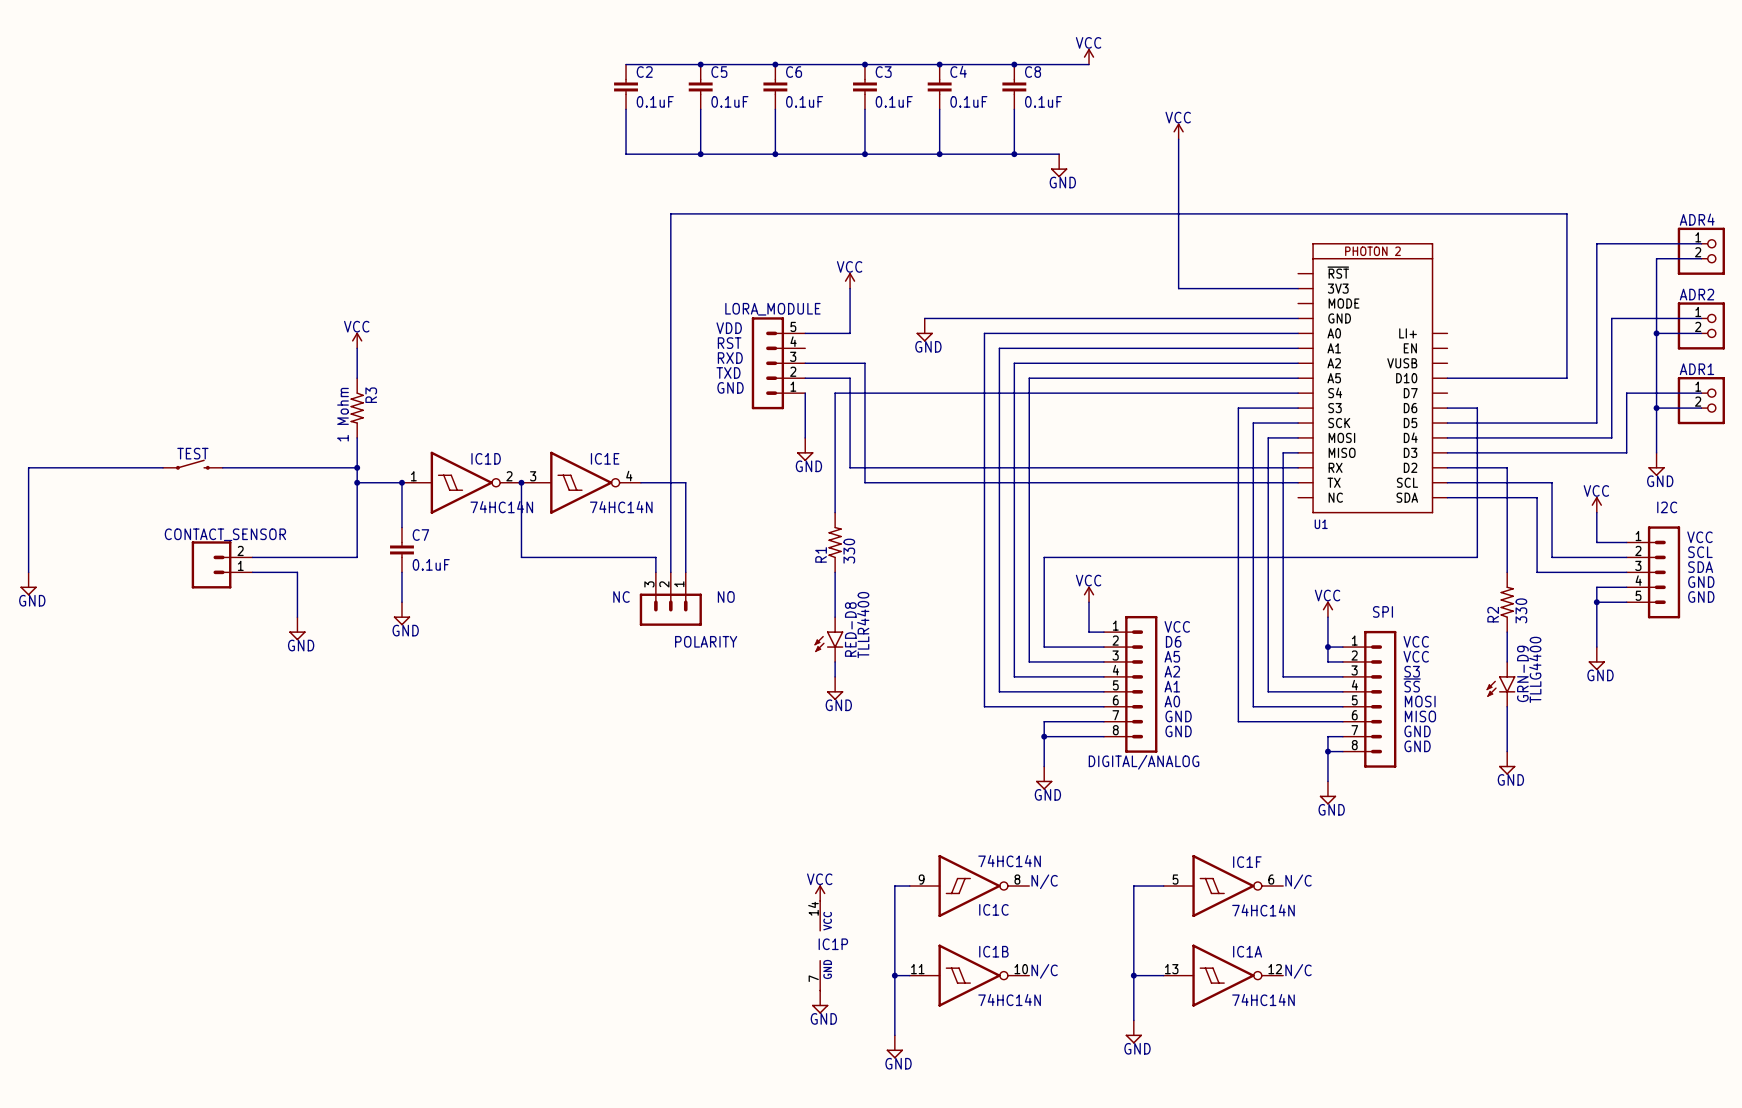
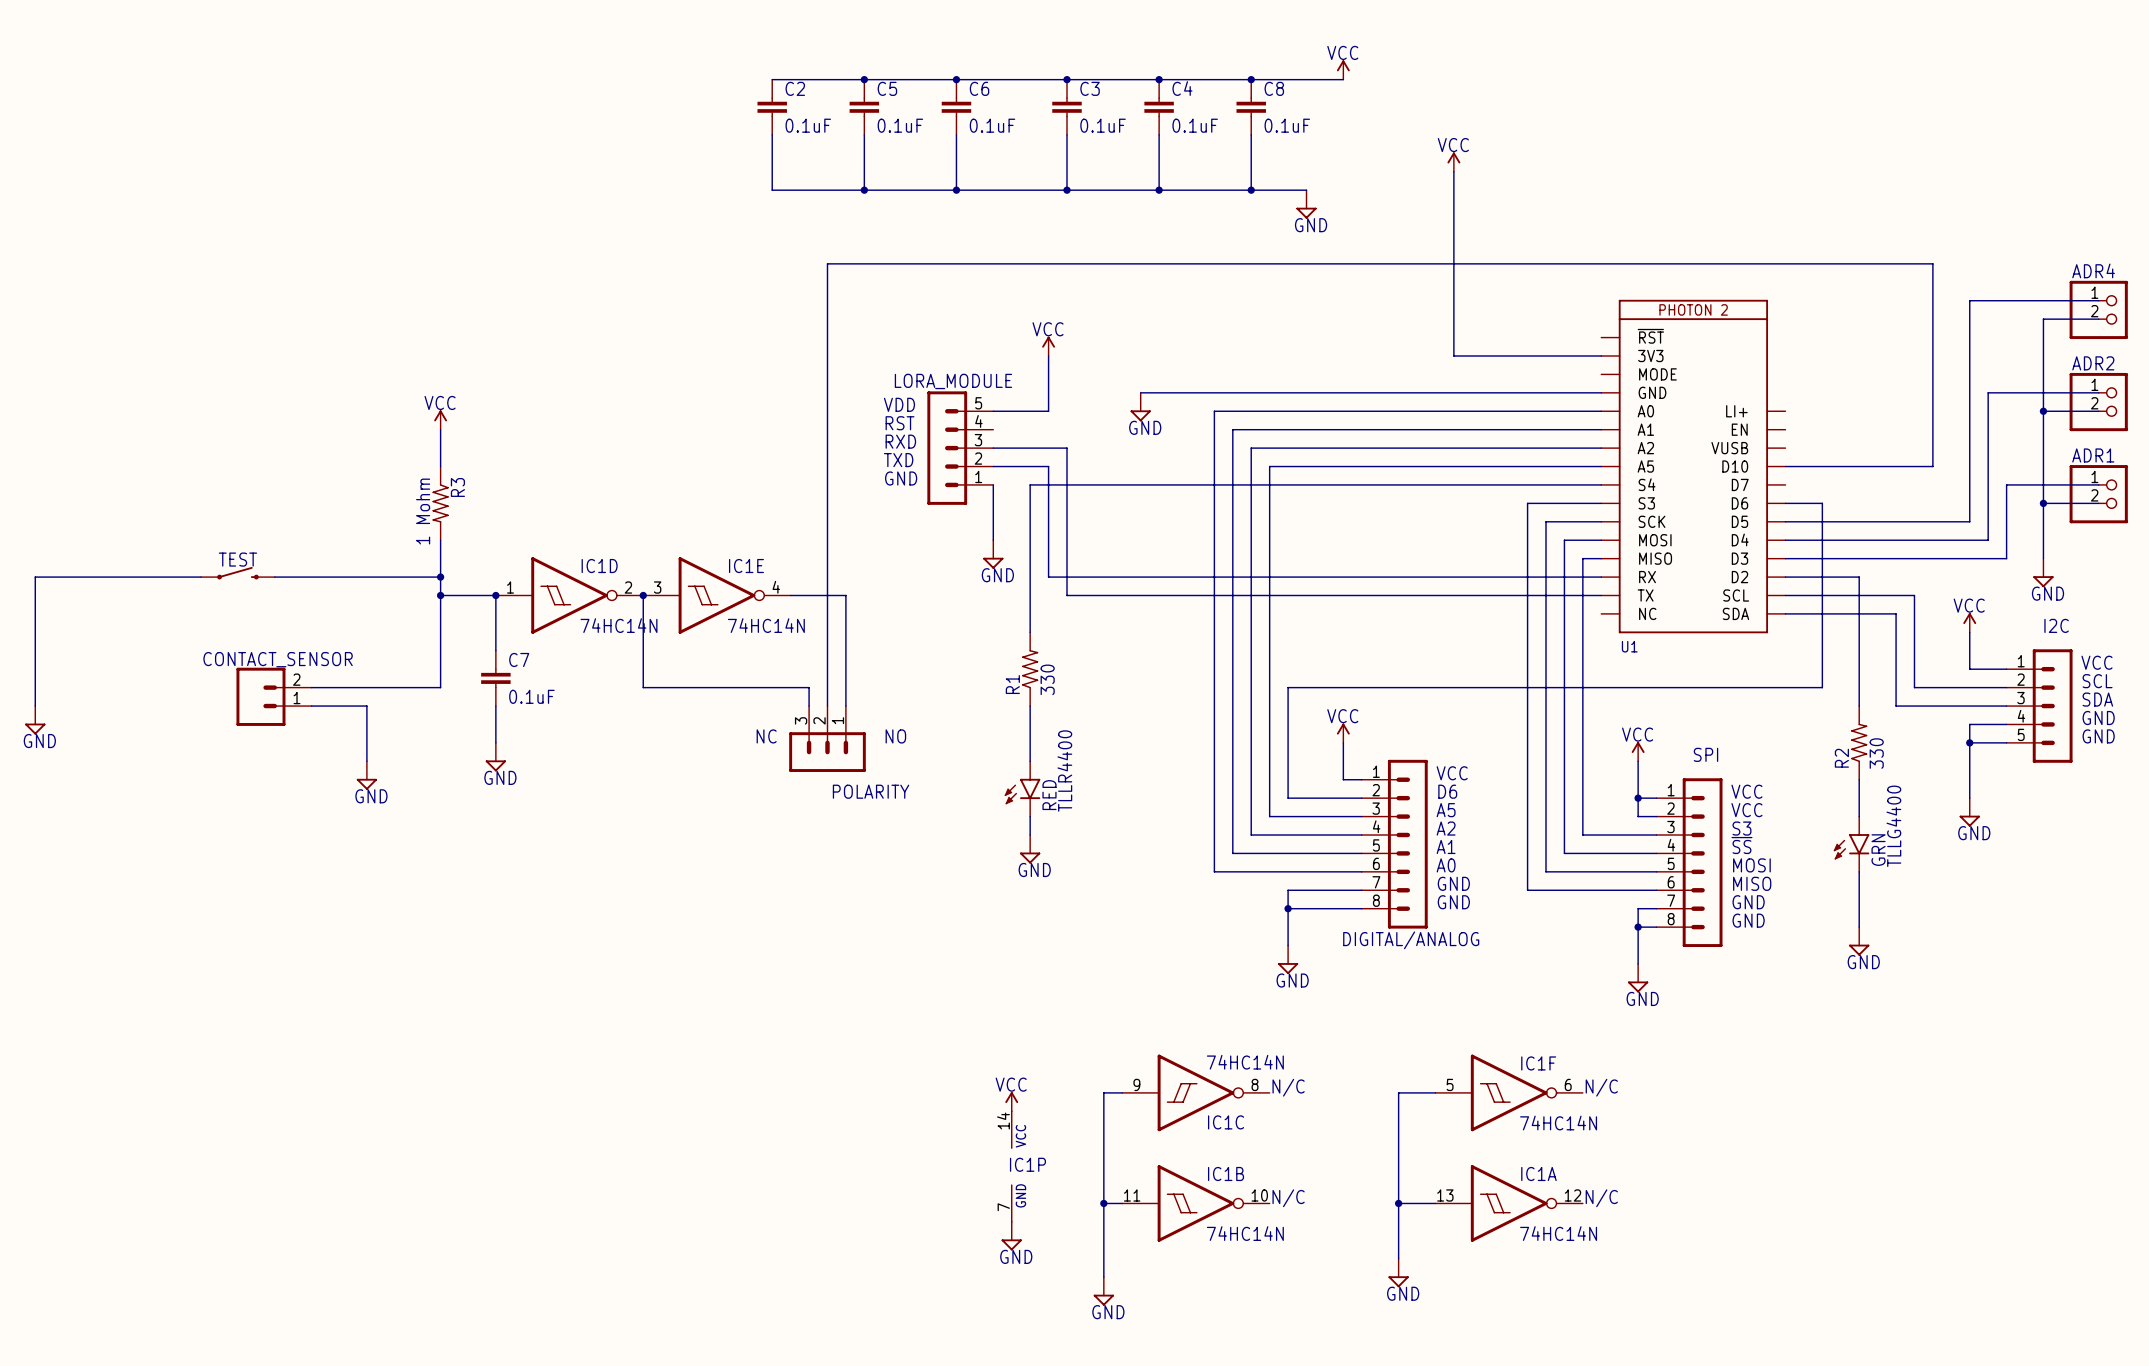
RED-D8 name: RED-D8 (850, 629) -> RED (1049, 795)
GRN-D9 name: GRN-D9 (1522, 673) -> GRN (1878, 850)

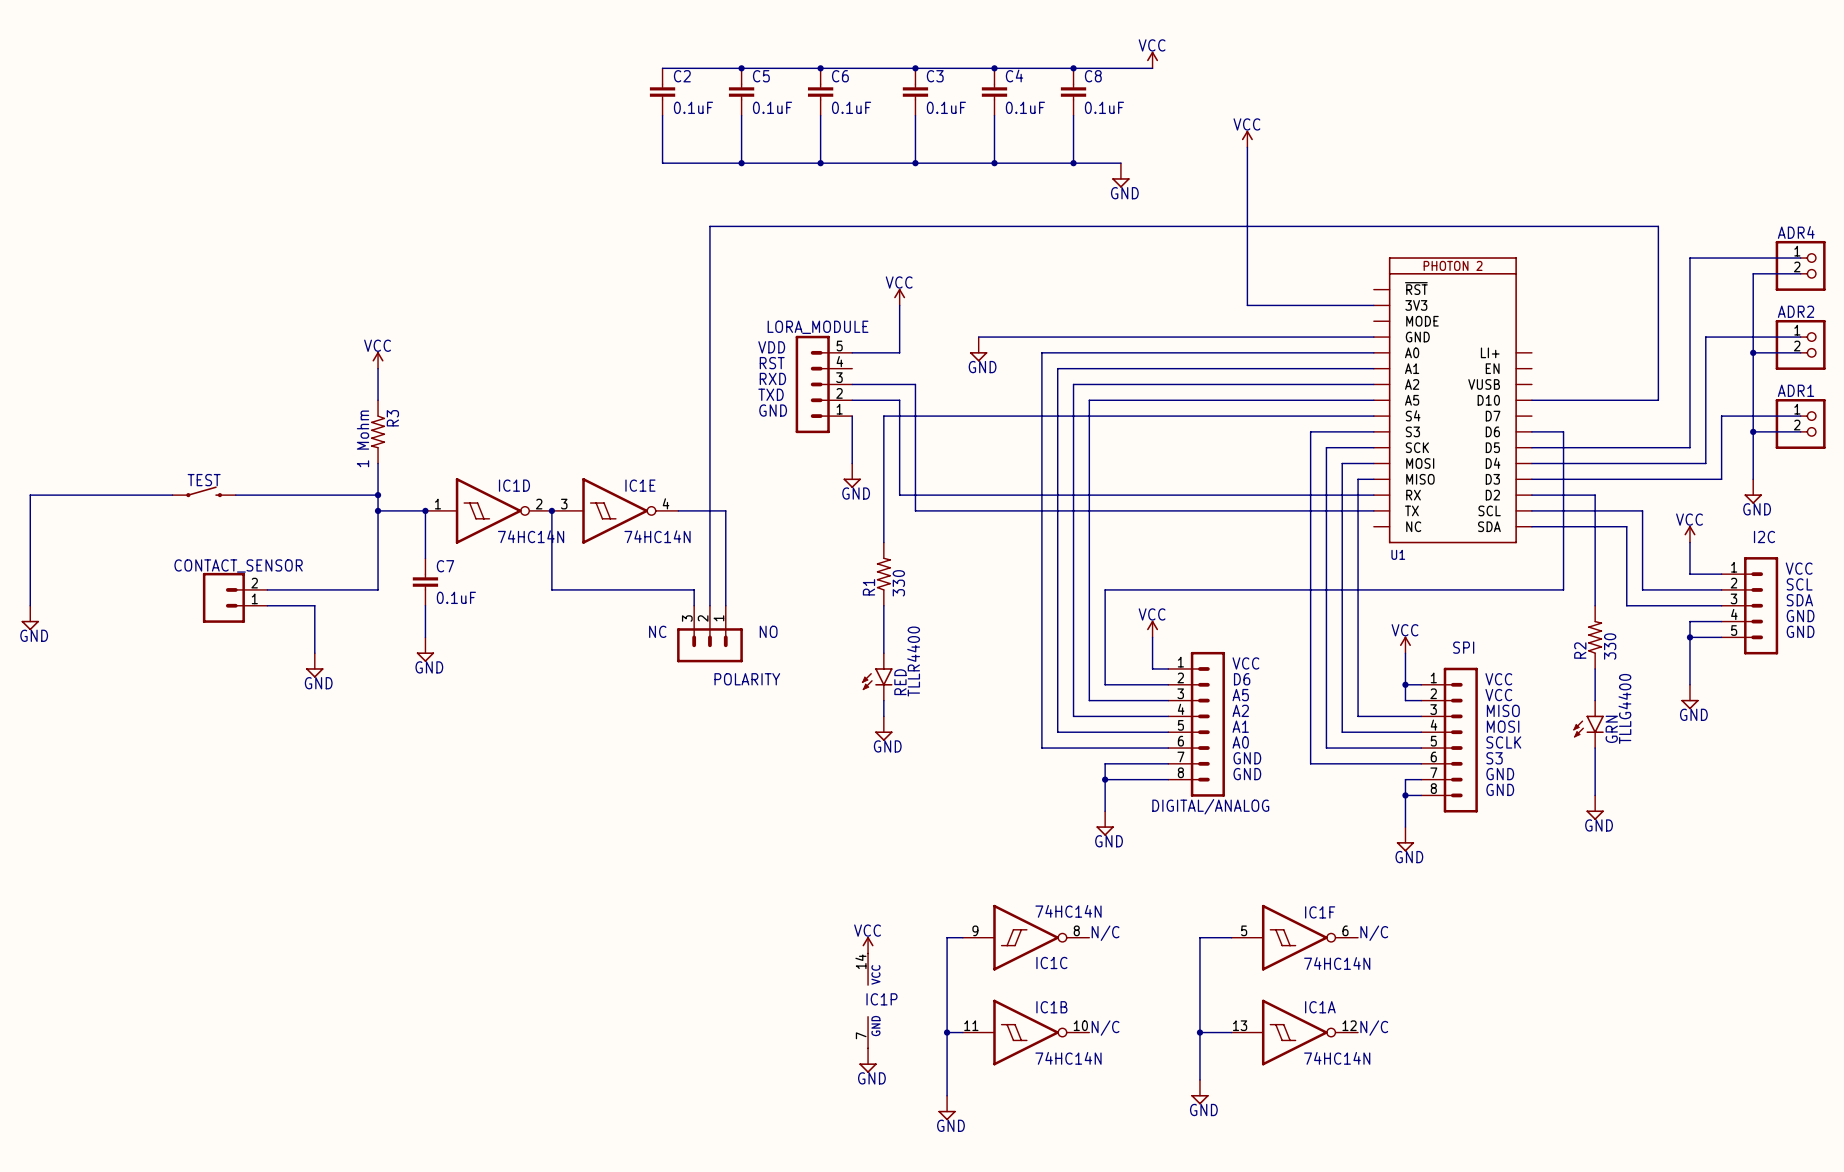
text: S3 (1741, 828) -> MISO (1503, 710)
text: ~{SS} (1741, 845) -> MOSI (1503, 726)
text: MOSI (1751, 865) -> SCLK (1503, 742)
text: MISO (1752, 883) -> S3 (1494, 758)

